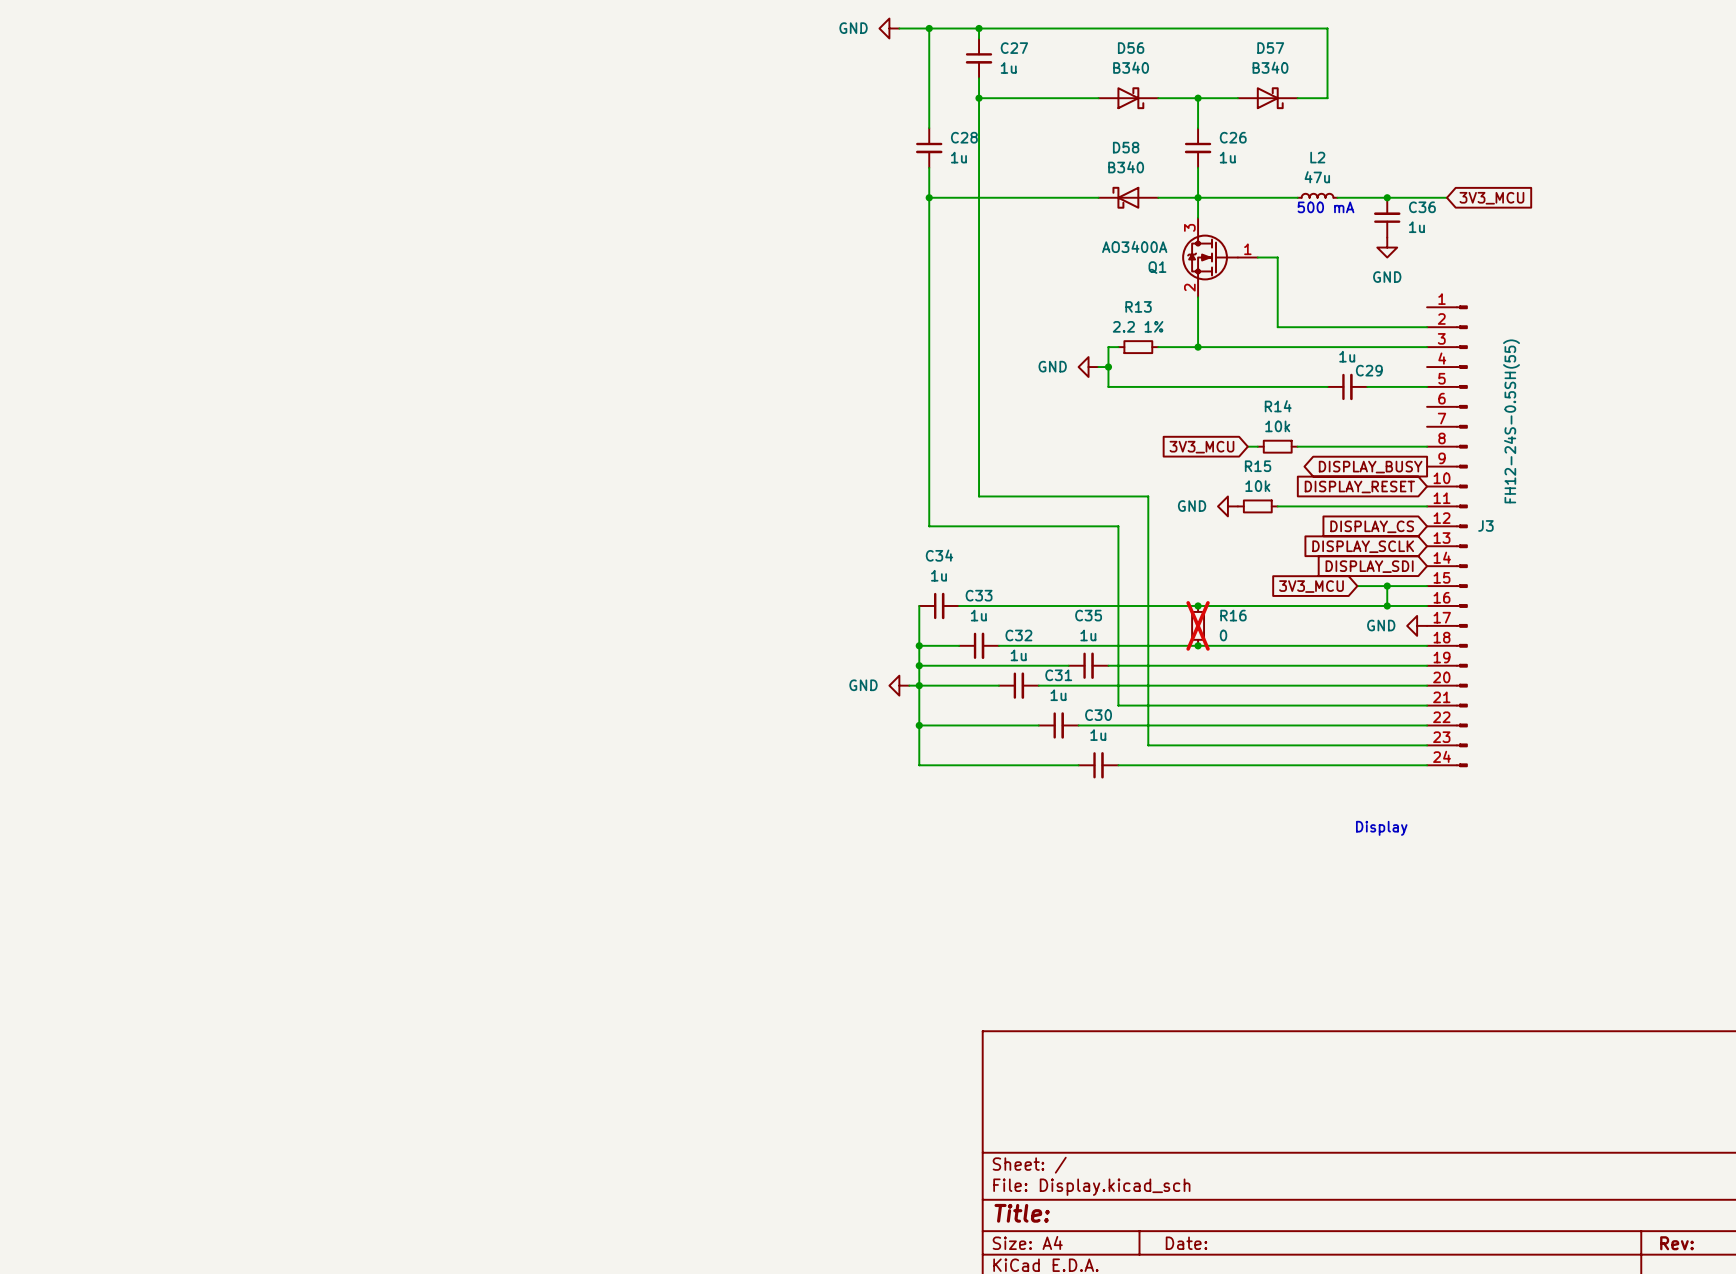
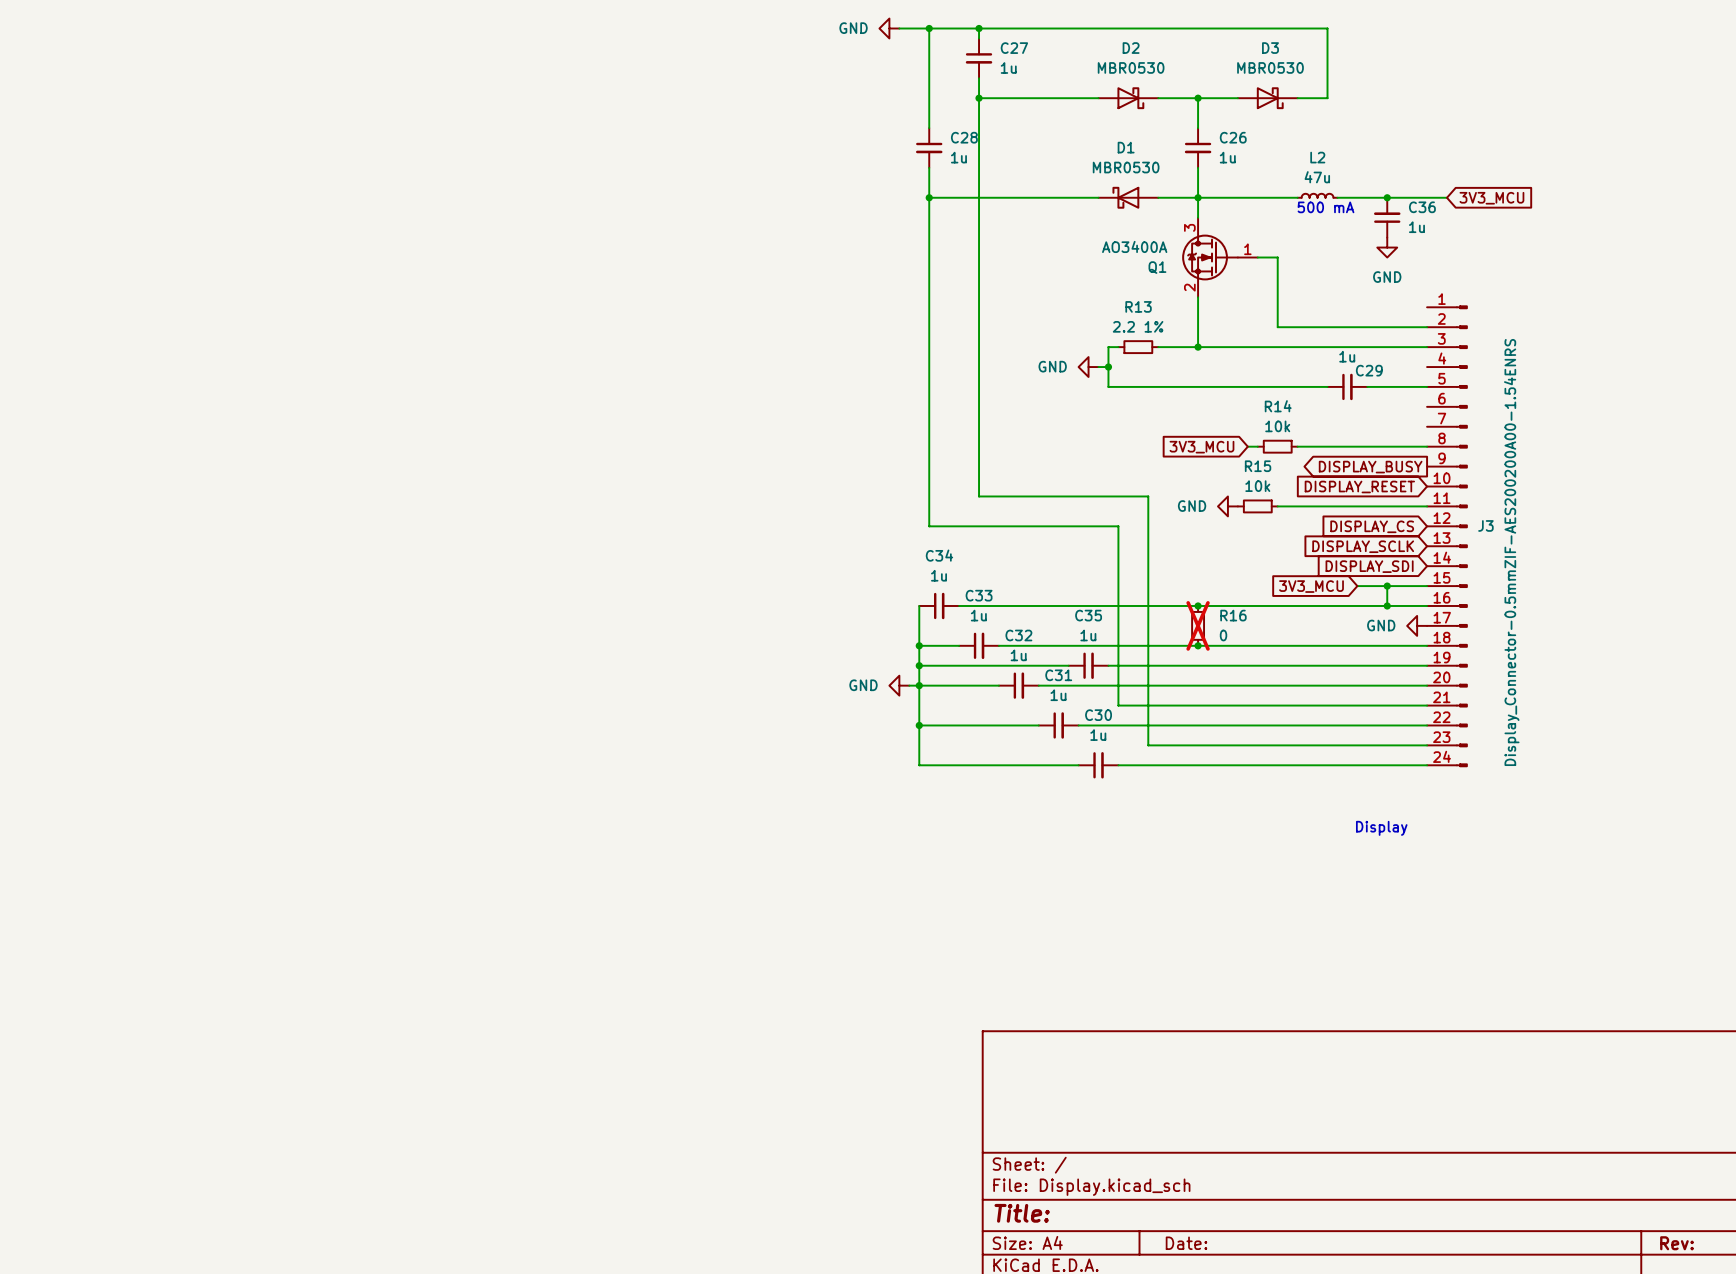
D56 name: D56 (1131, 48) -> D2 (1131, 48)
D57 name: D57 (1270, 48) -> D3 (1270, 48)
D56 value: B340 (1131, 67) -> MBR0530 (1131, 67)
D57 value: B340 (1270, 67) -> MBR0530 (1270, 67)
D58 name: D58 (1126, 147) -> D1 (1126, 147)
D58 value: B340 (1126, 167) -> MBR0530 (1126, 167)
J3 value: FH12-24S-0.5SH(55) (1511, 421) -> Display_Connector-0.5mmZIF-AES200200A00-1.54ENRS (1511, 552)

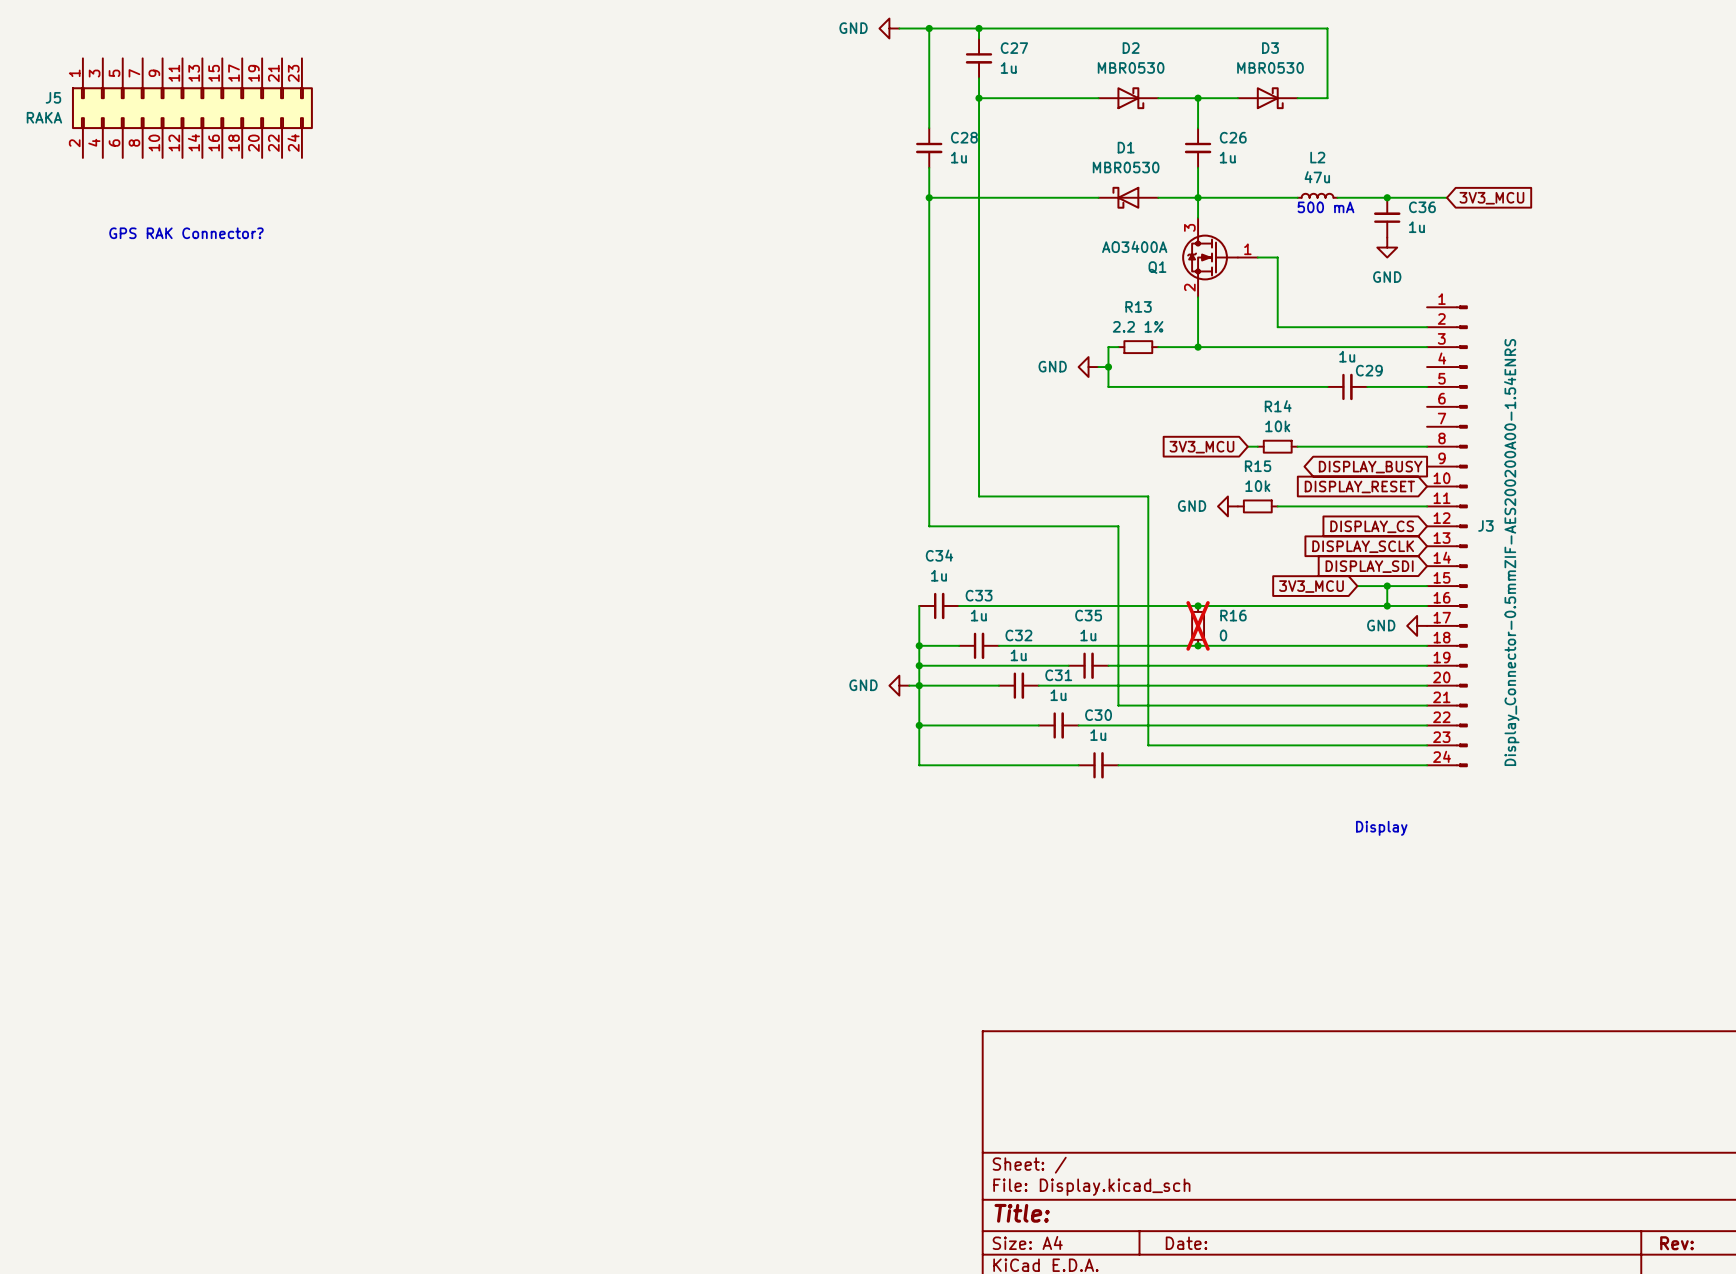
J5: none -> RAKA (192, 108)
text: none -> GPS RAK Connector? (186, 233)

